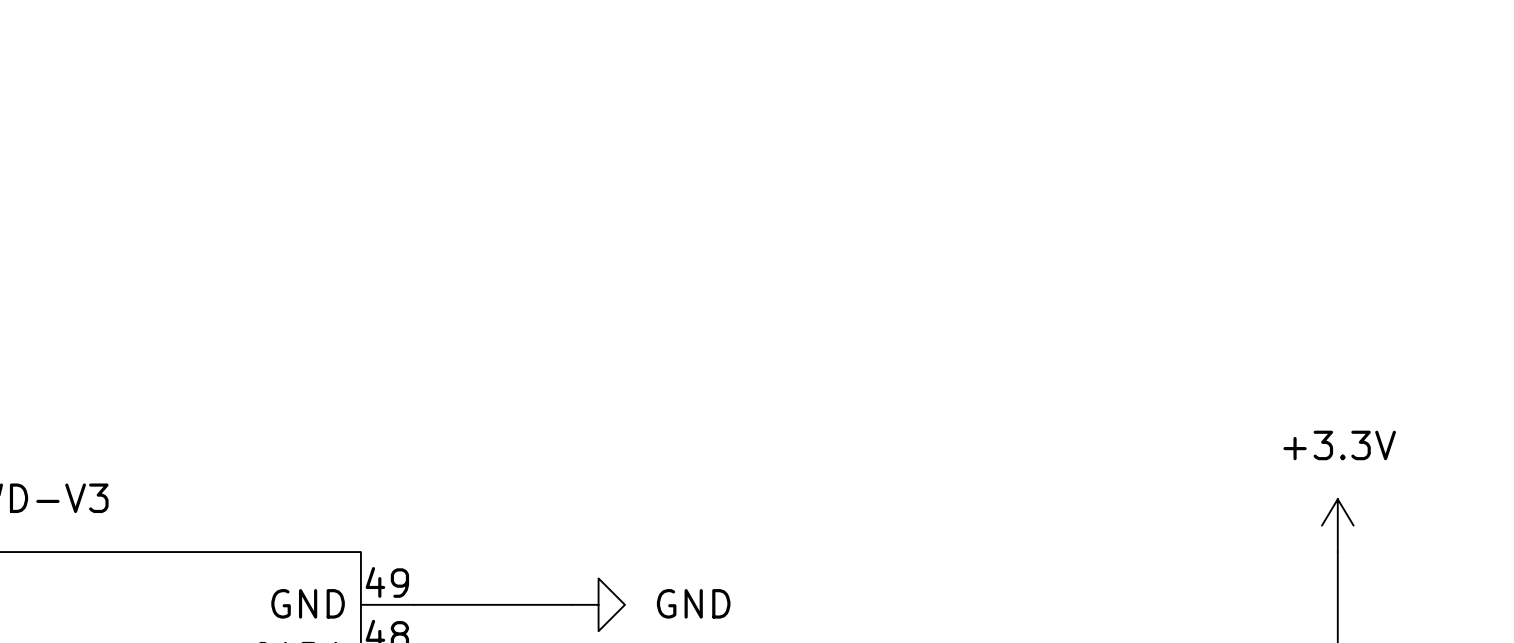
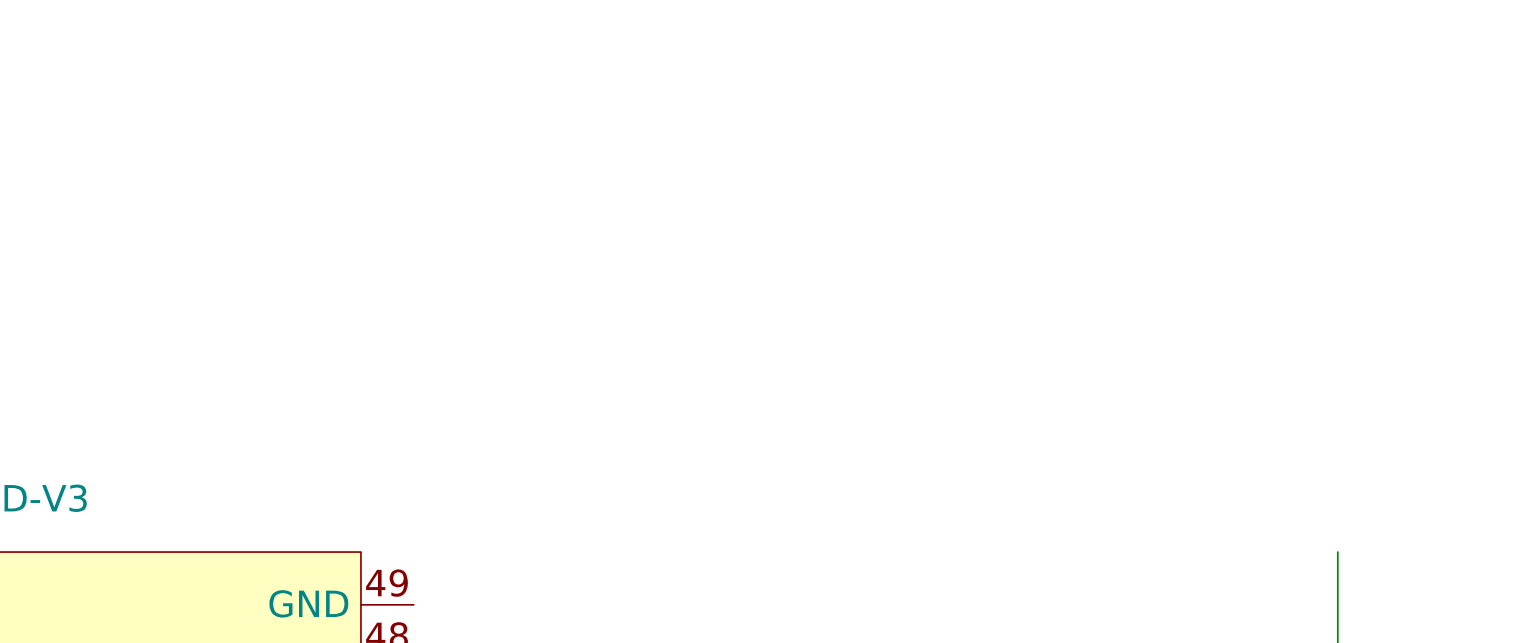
power symbol: +3.3V (1337, 525) -> none
wire: (413, 604) (572, 604) -> none
power symbol: GND (598, 604) -> none

